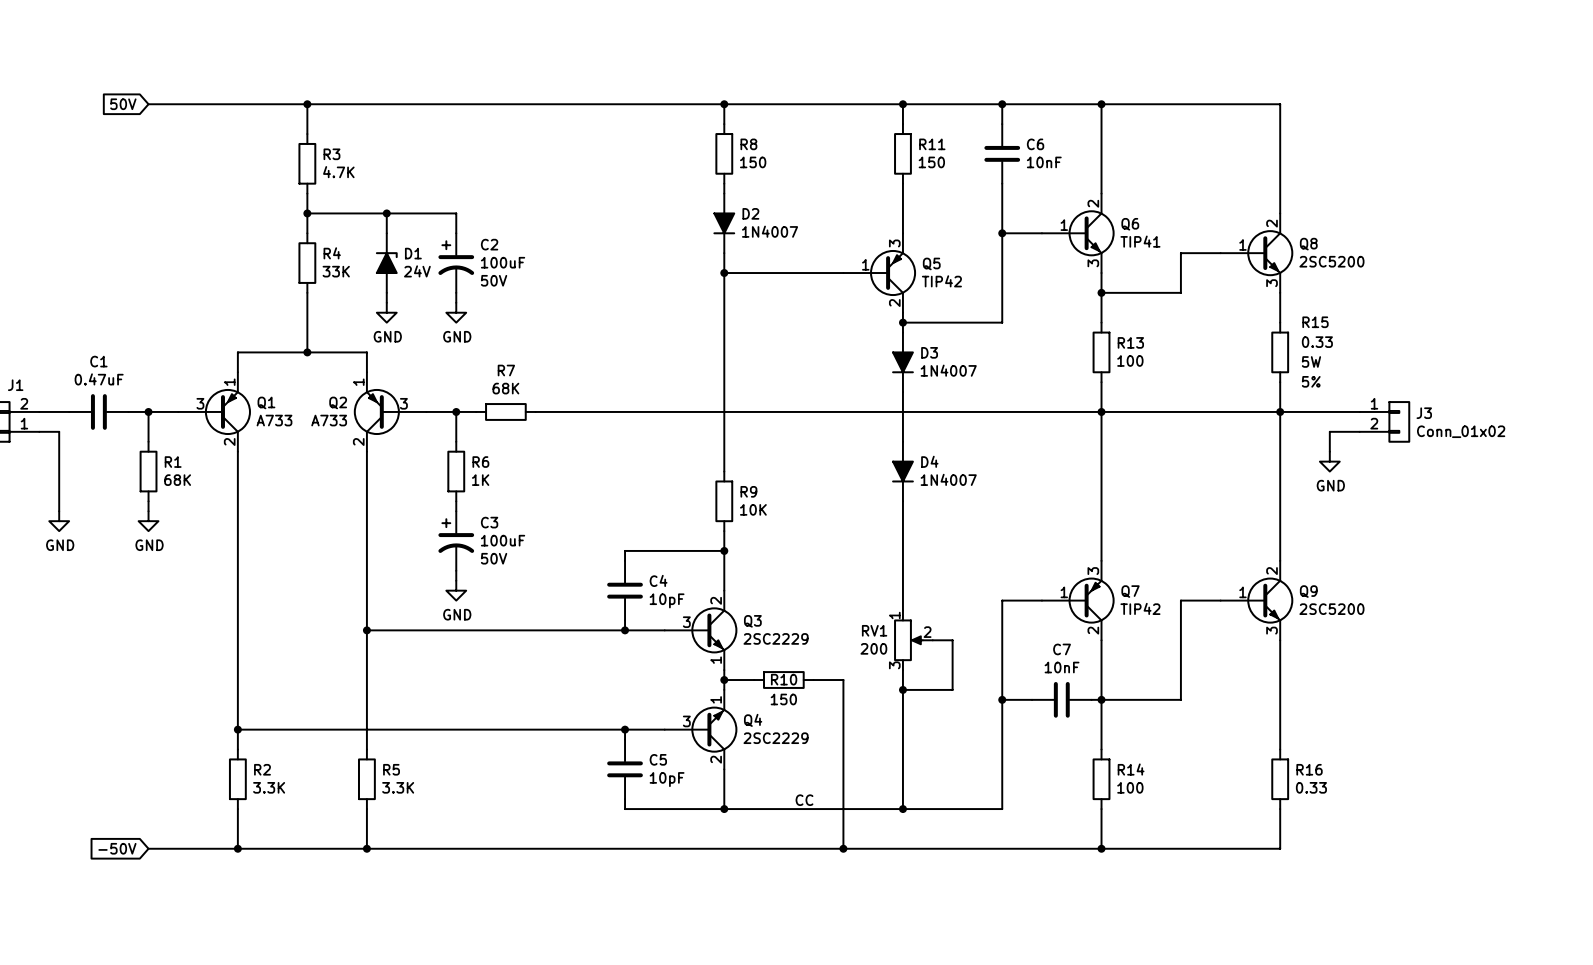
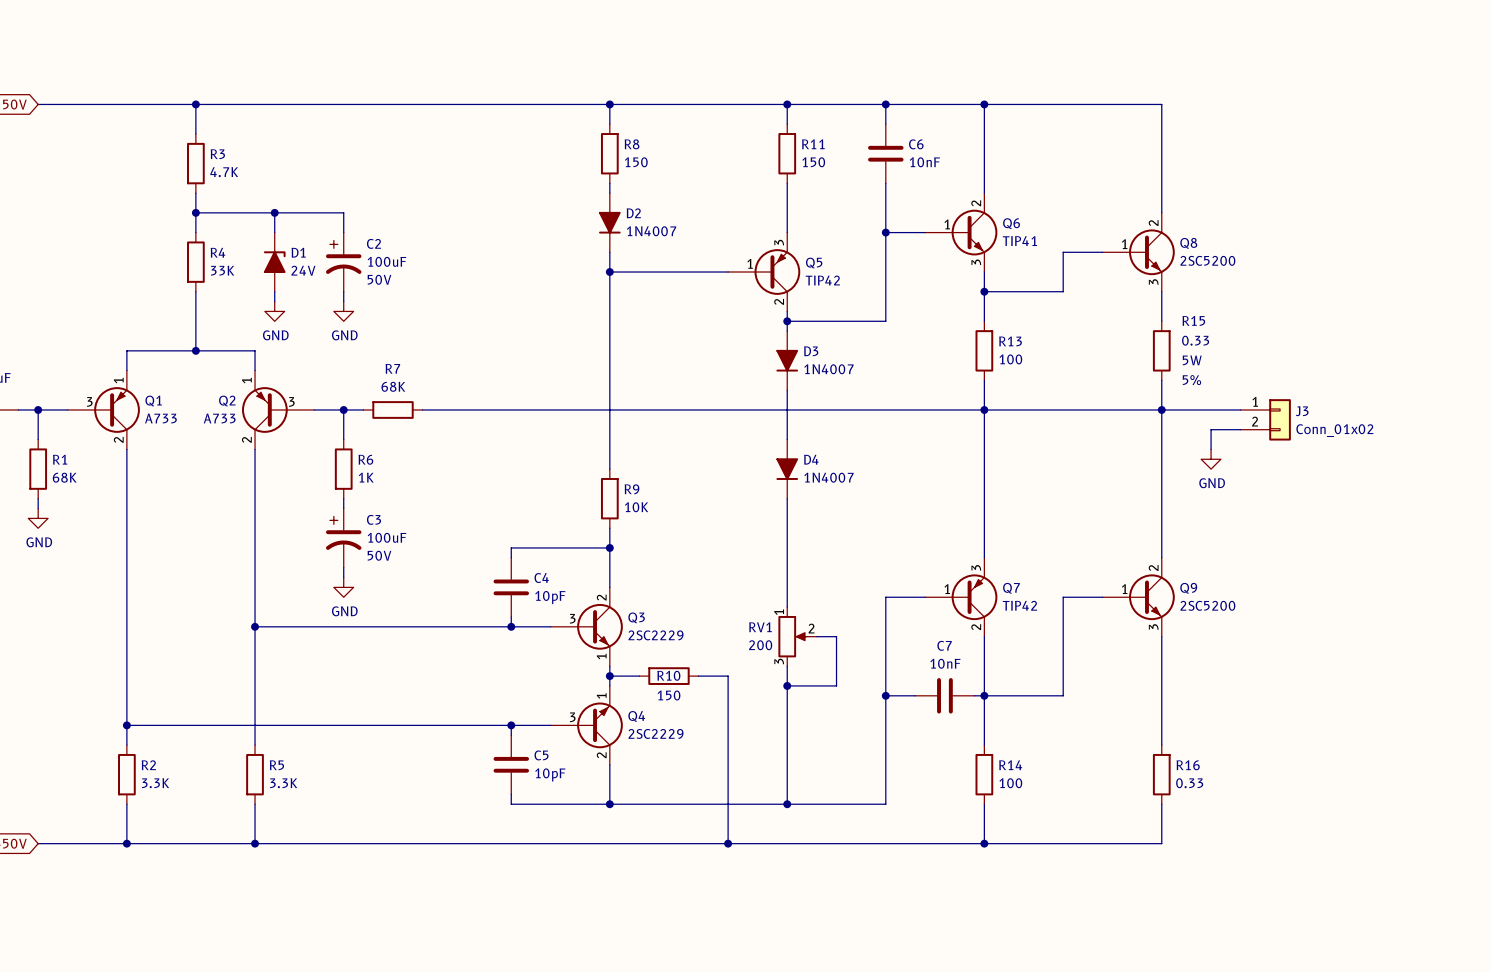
label: CC (804, 800) -> none

